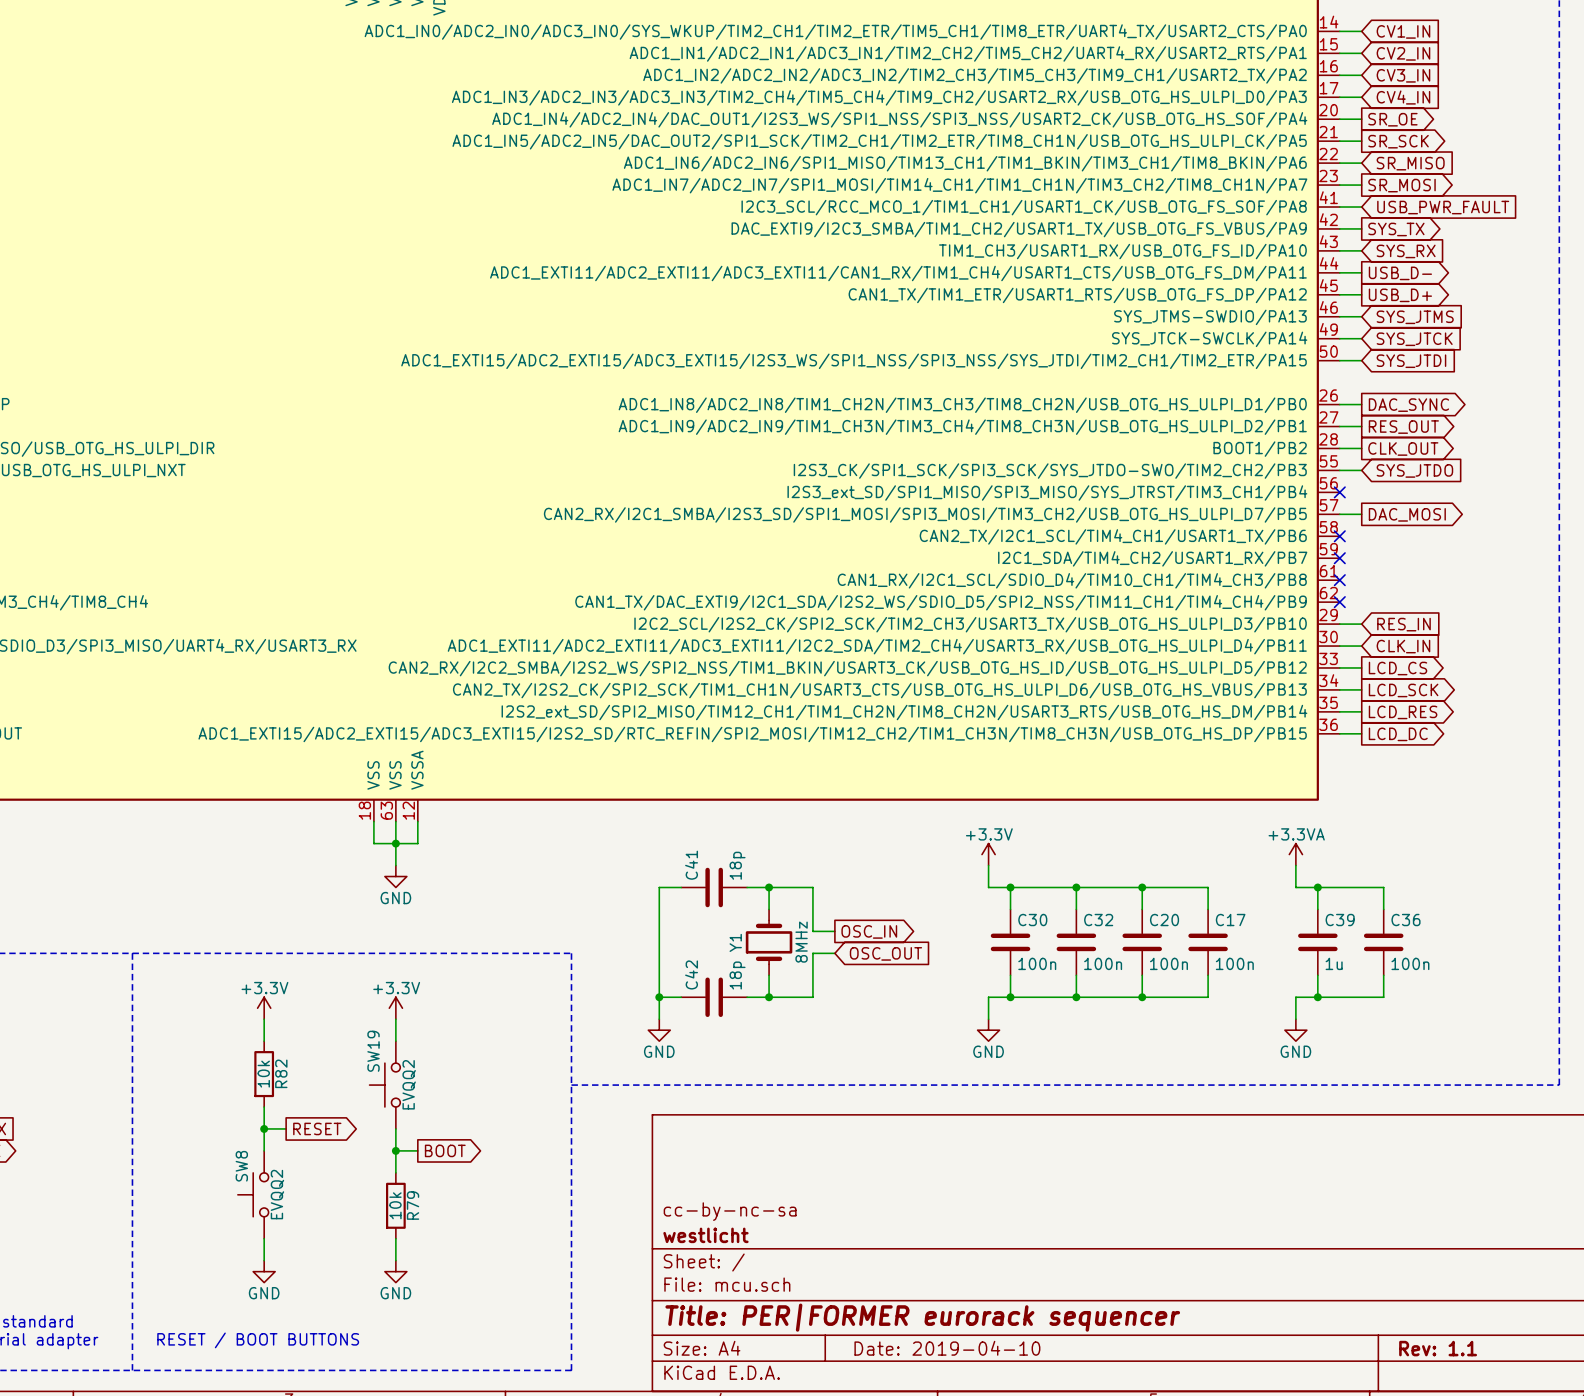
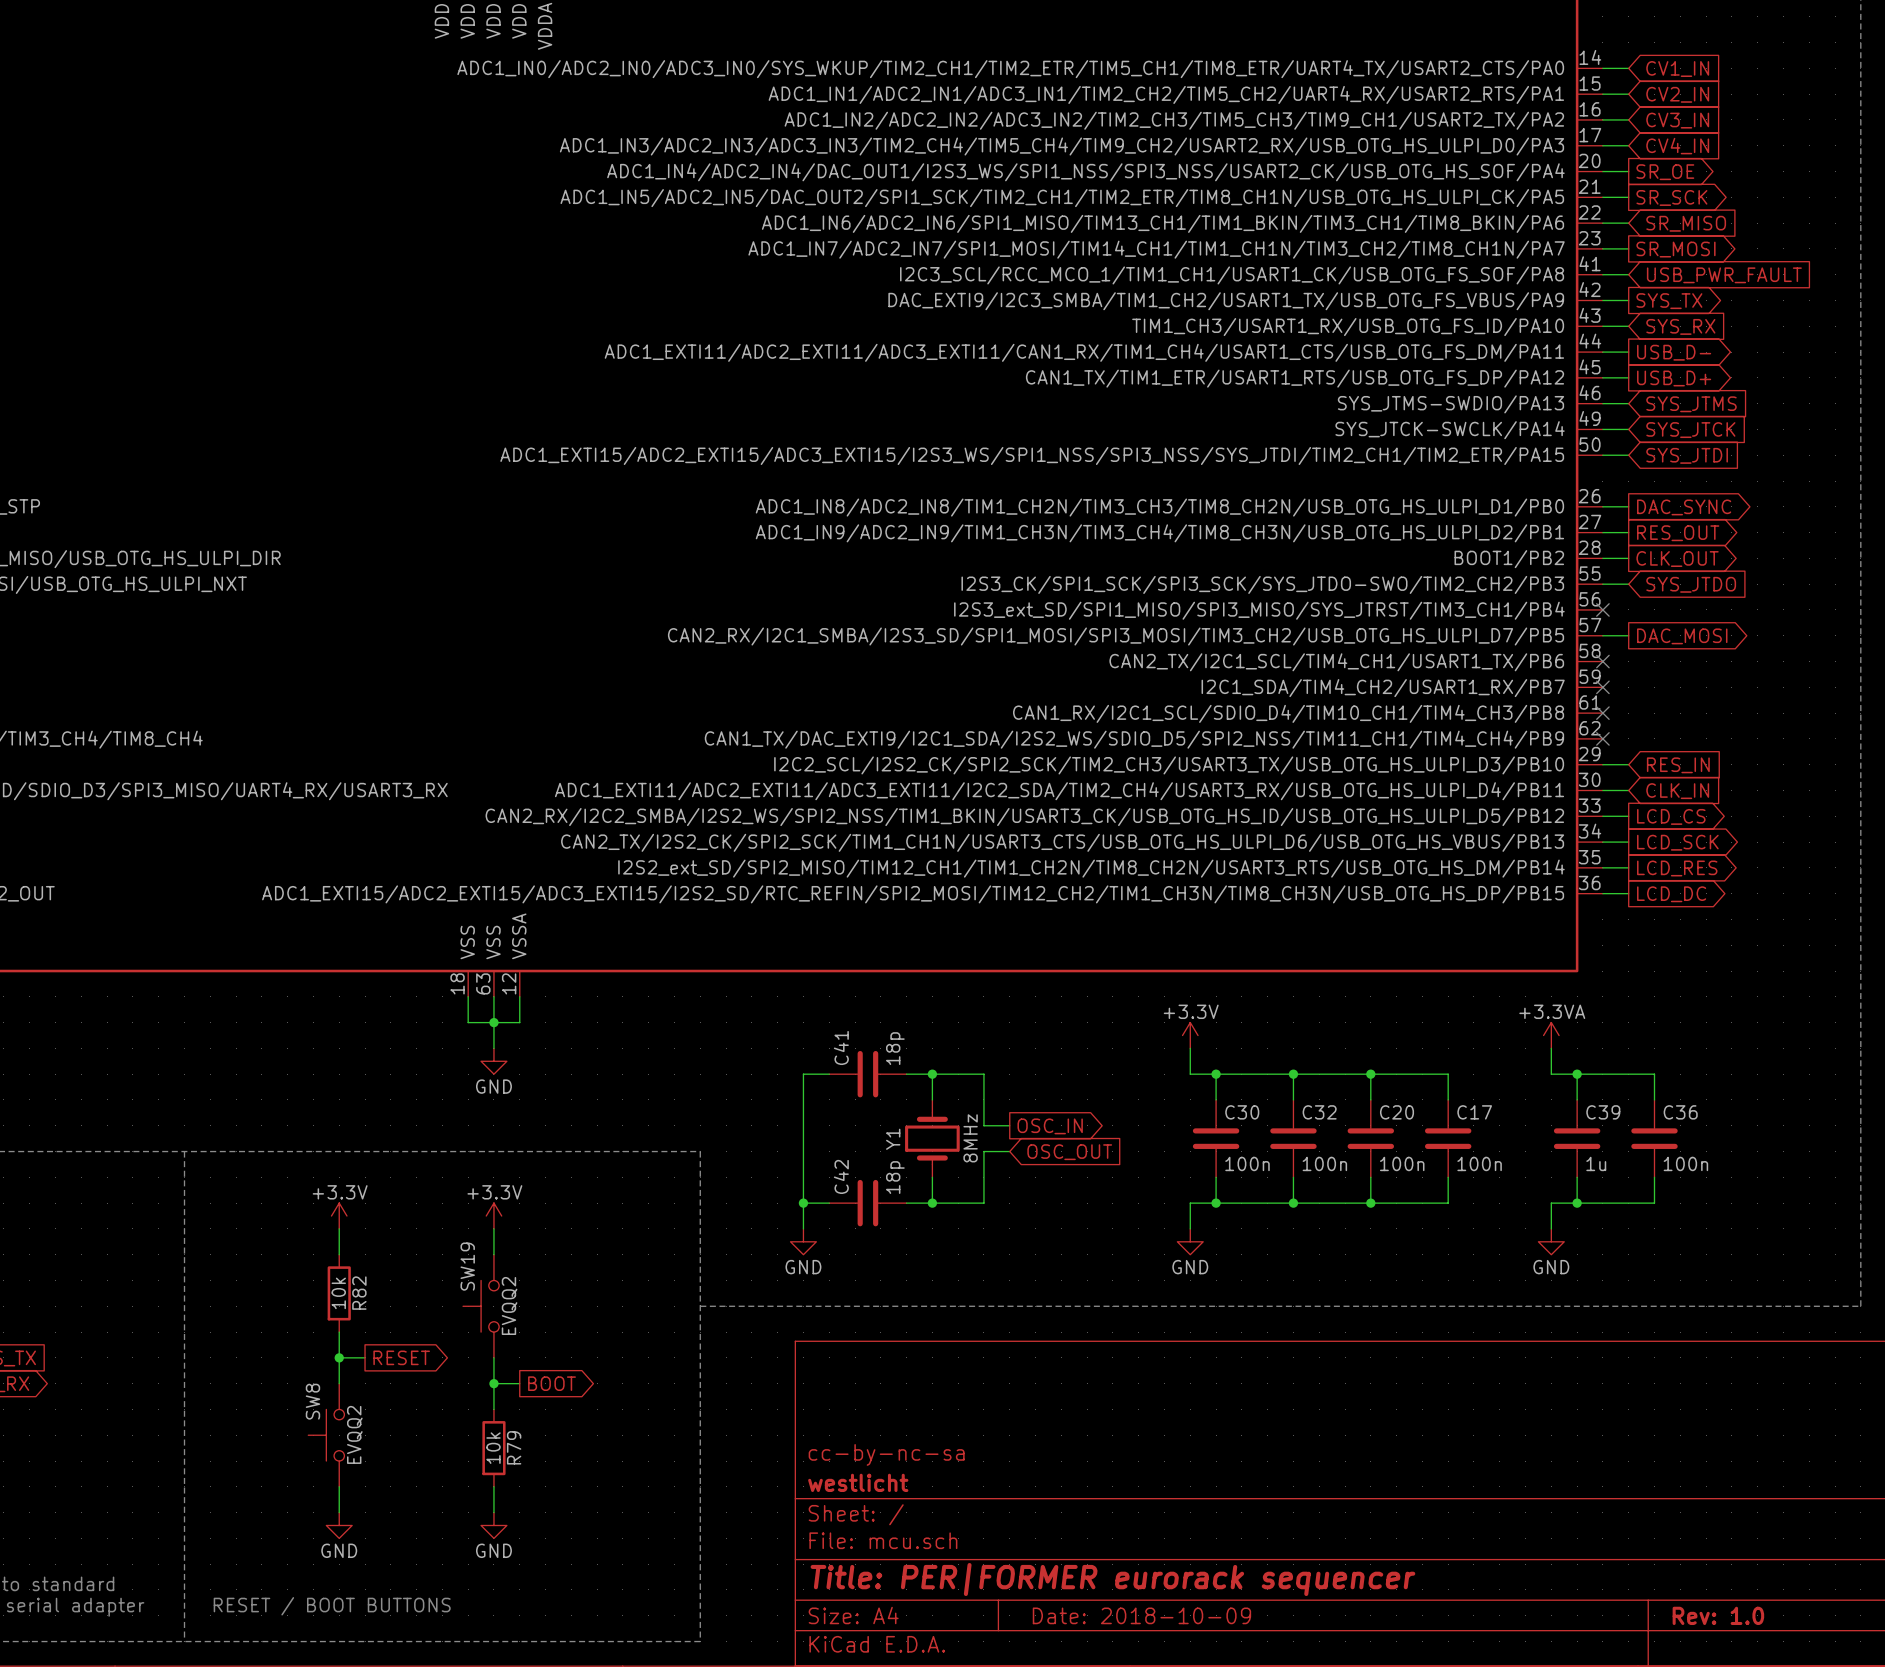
title block: Date: 2019-04-10 (947, 1348) -> Date: 2018-10-09 (1141, 1615)
title block: Rev: 1.1 (1438, 1348) -> Rev: 1.0 (1718, 1615)

